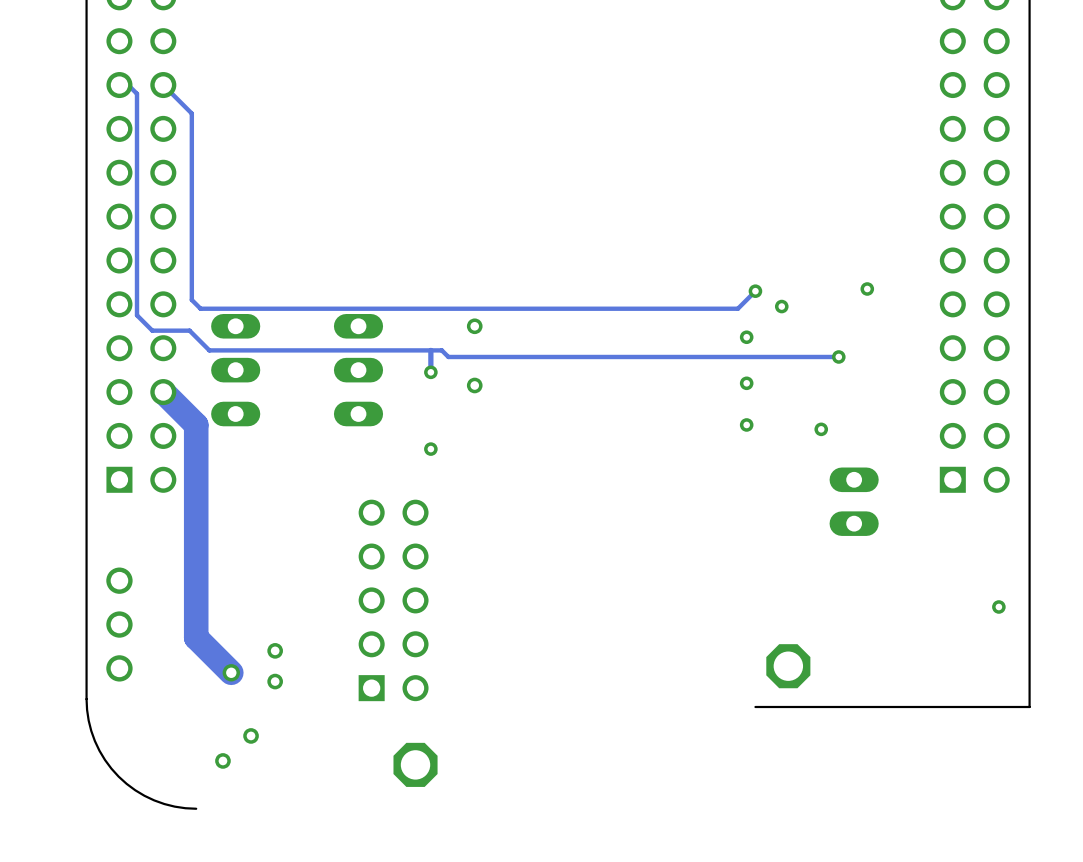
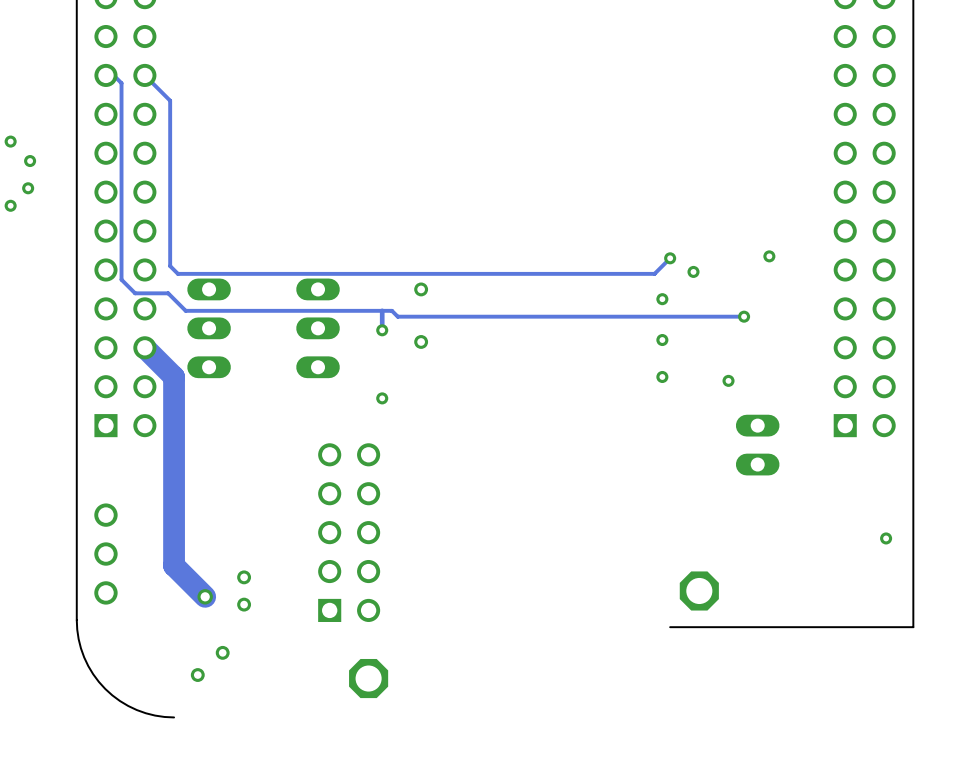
via: none -> (10, 141)
via: none -> (30, 161)
via: none -> (28, 188)
via: none -> (10, 205)

